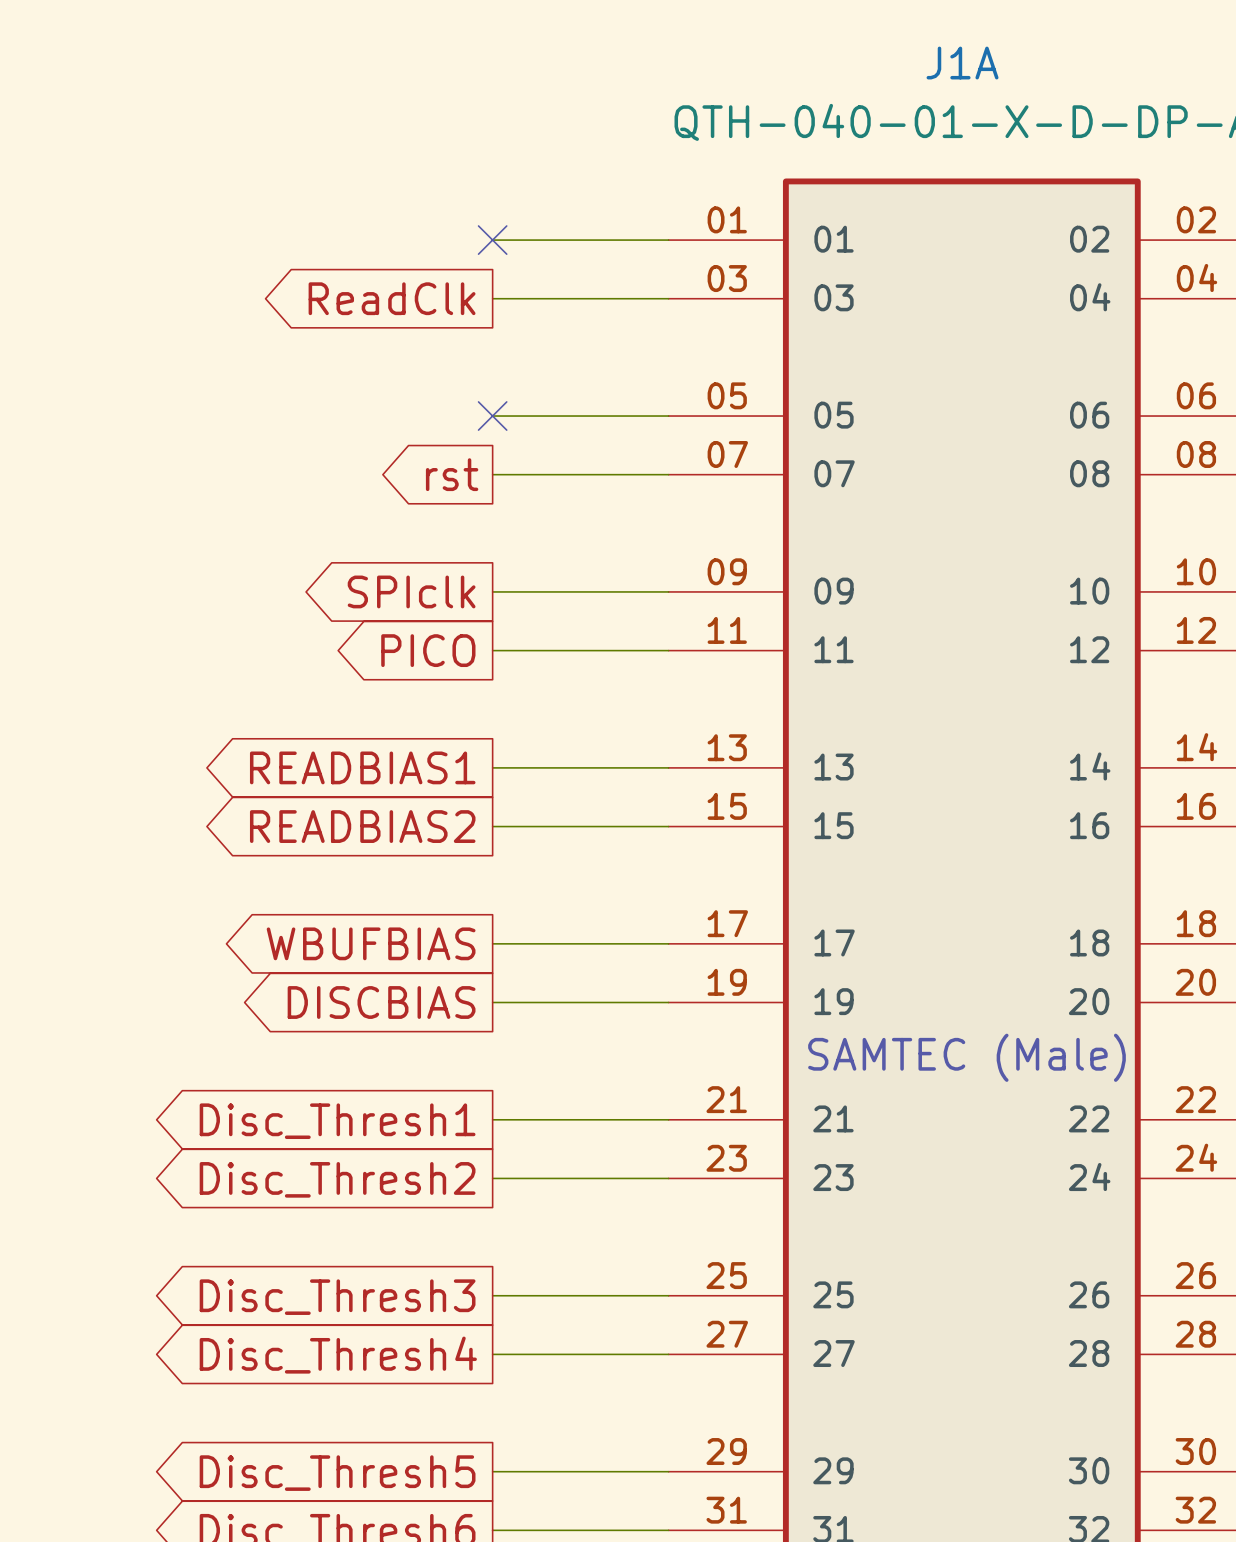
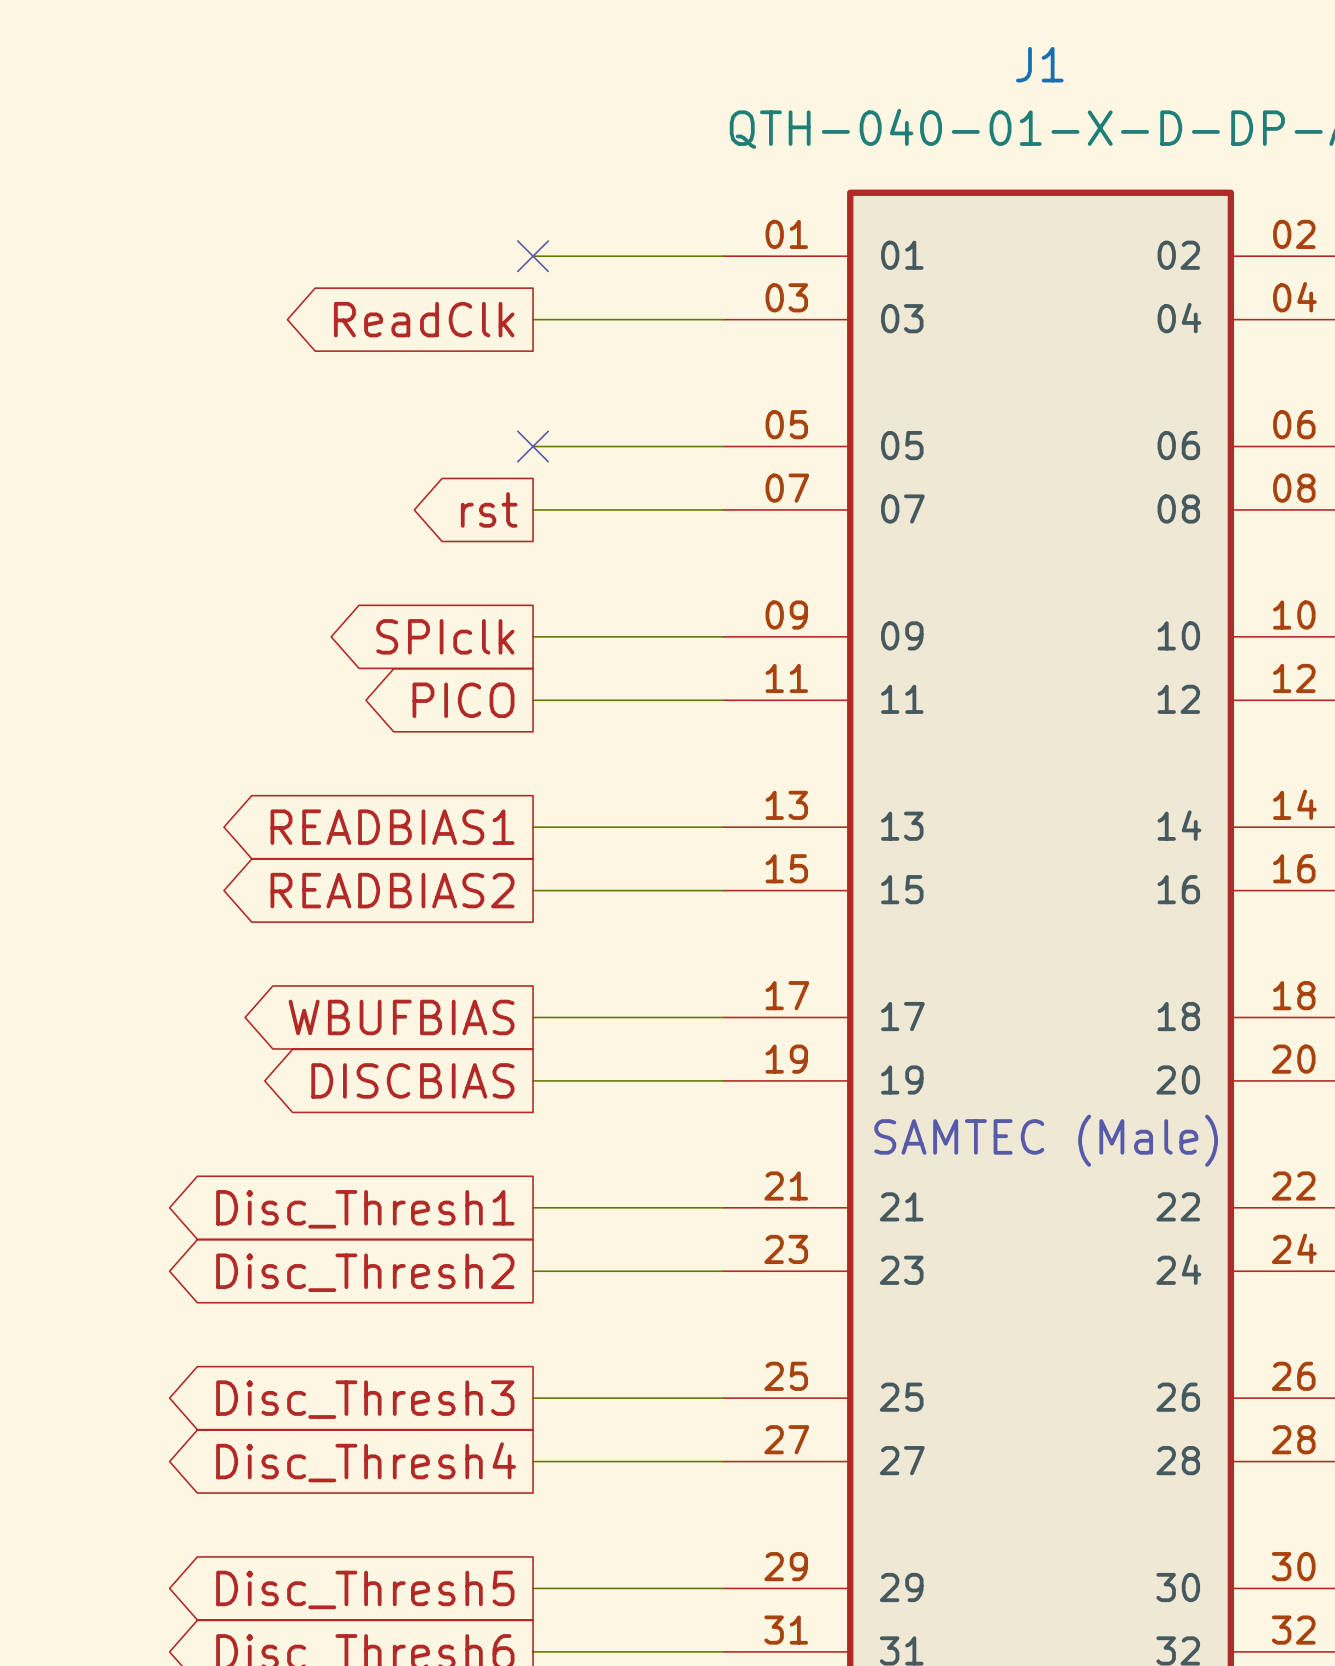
J1A name: J1A (962, 63) -> J1 (1039, 64)

